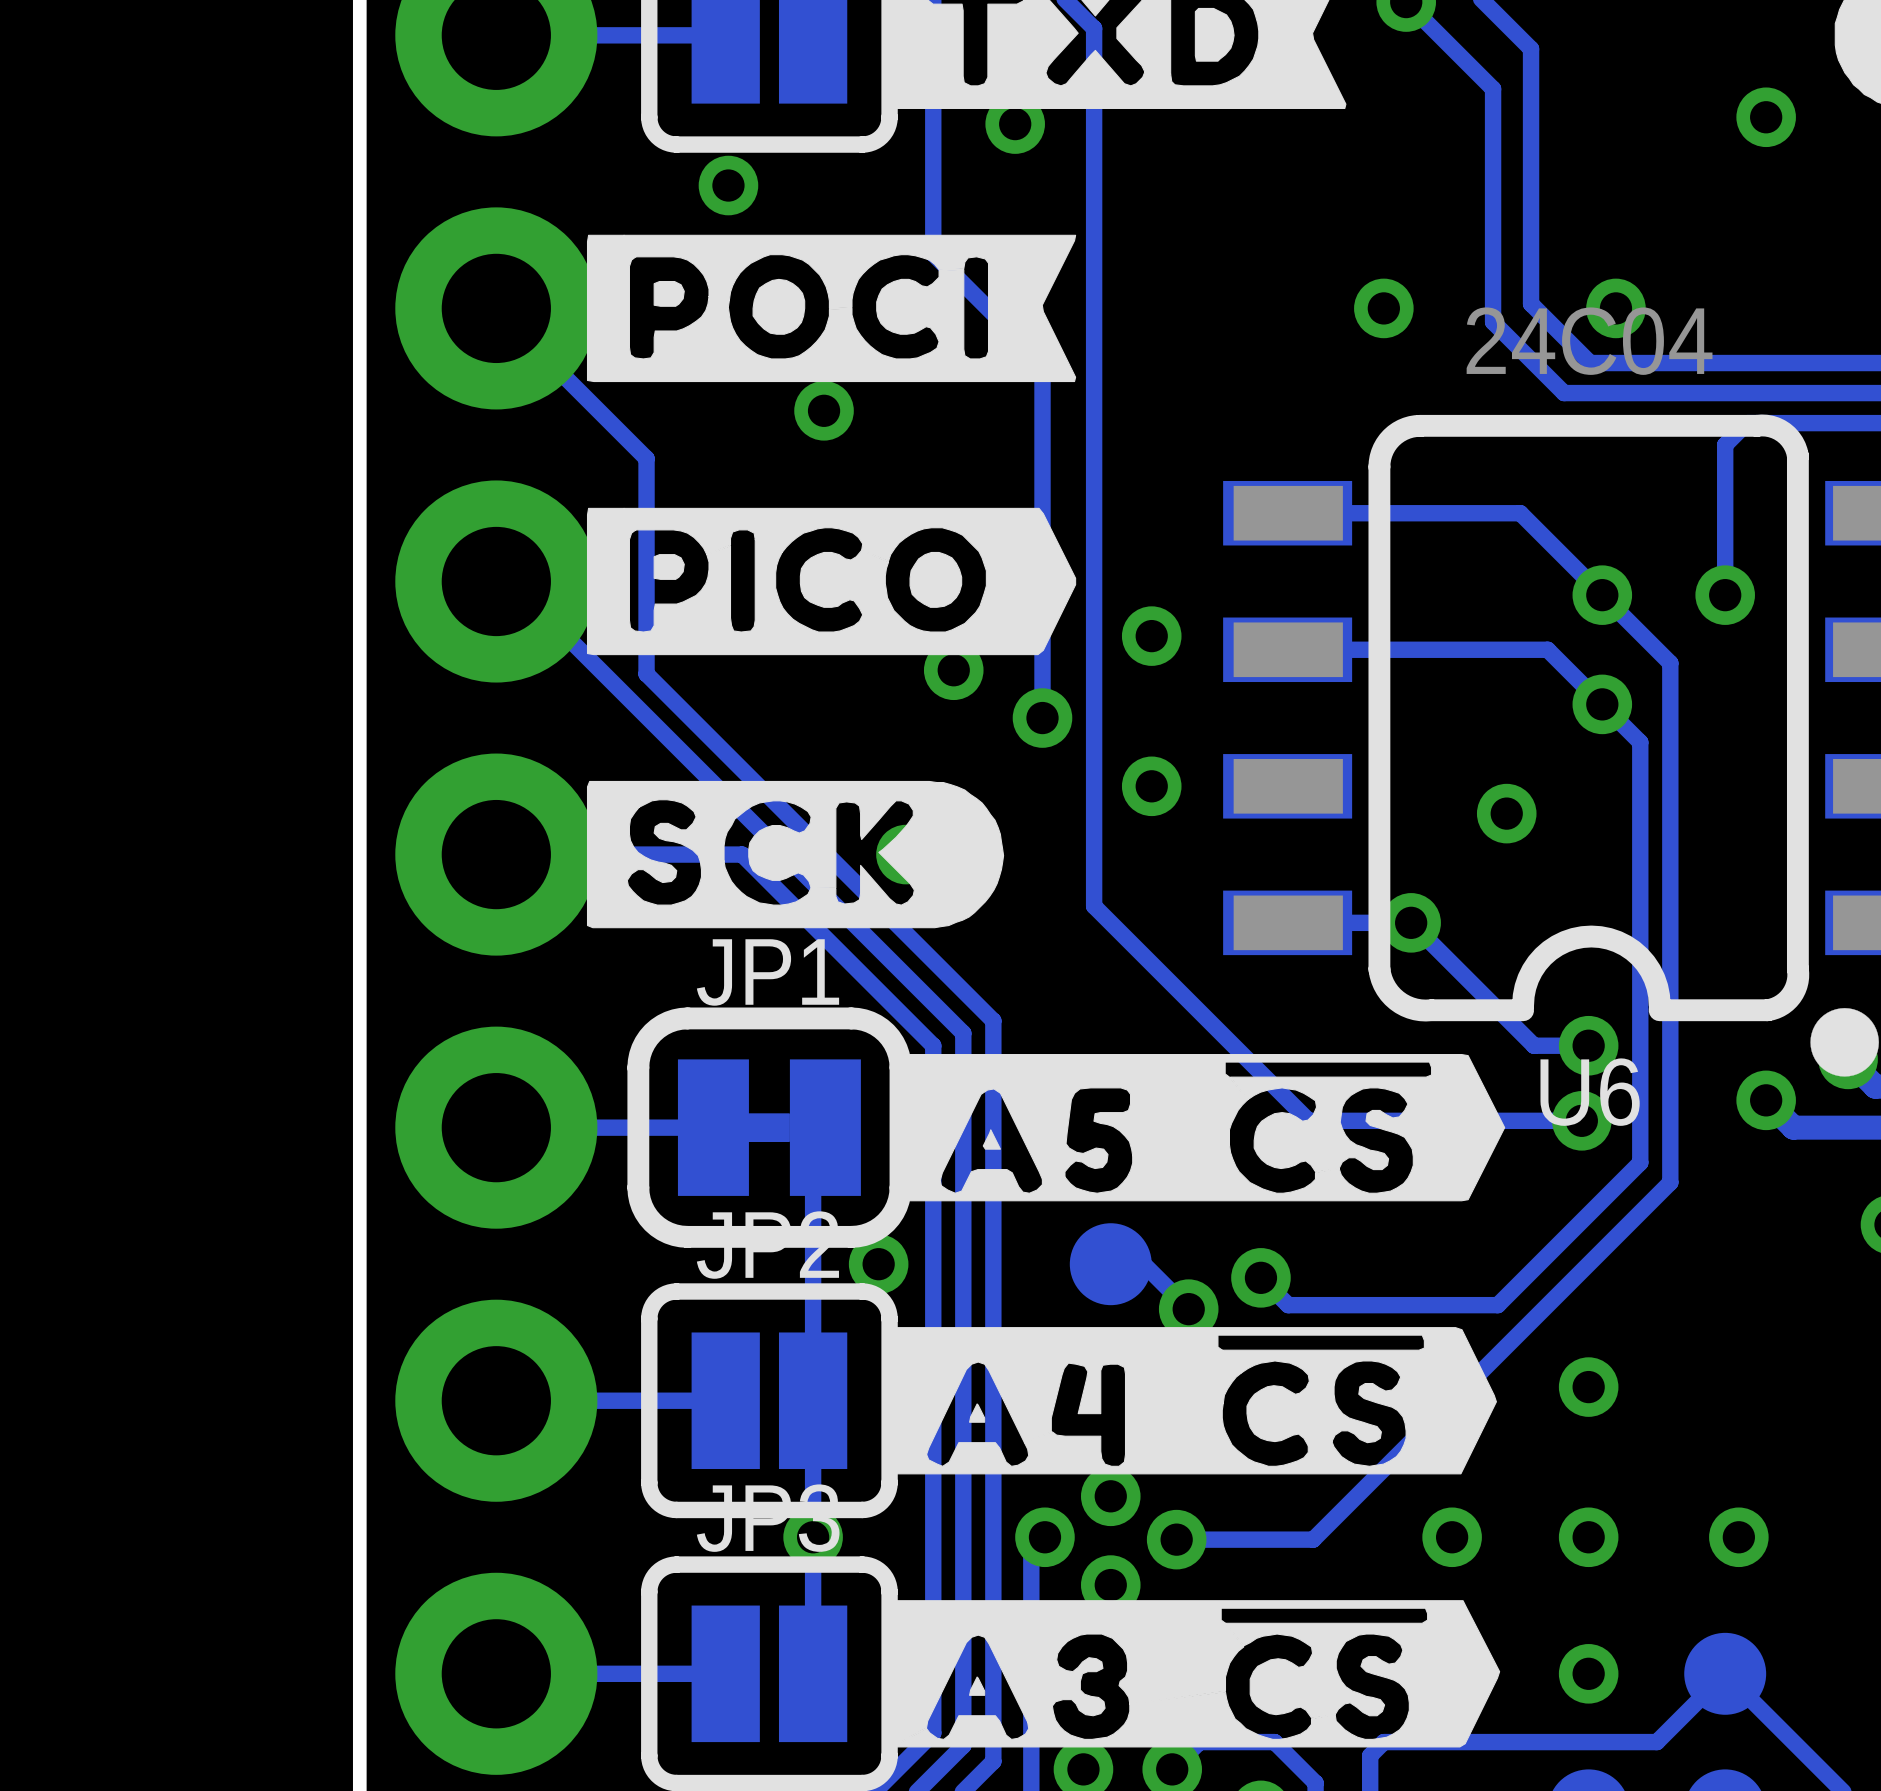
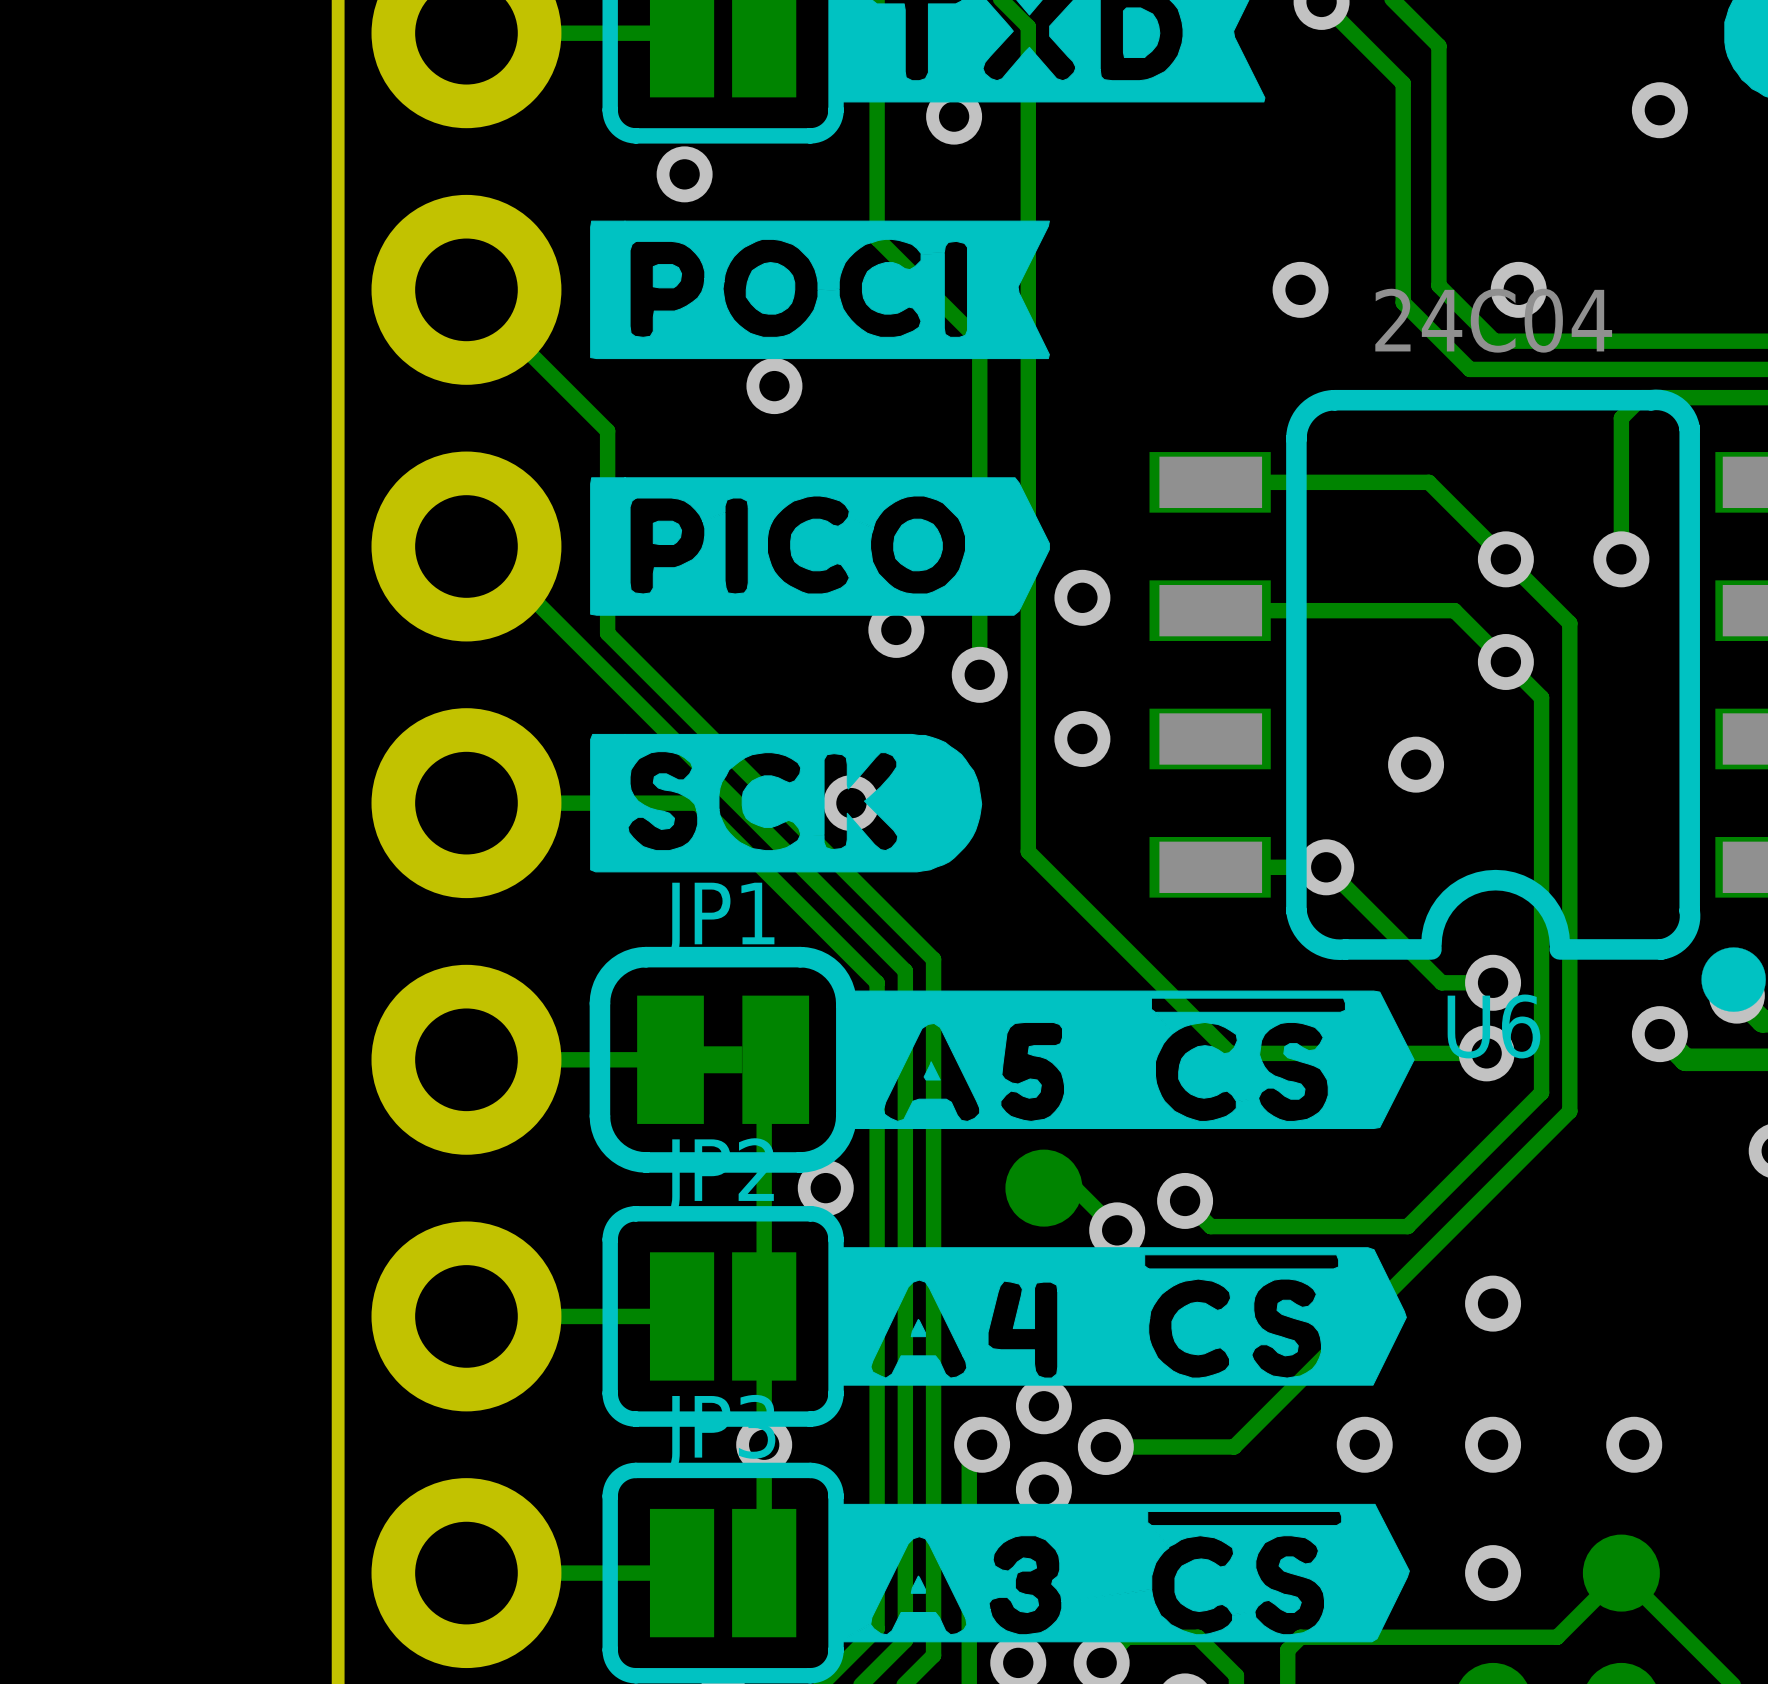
drawing position: (831, 308) -> (820, 289)
drawing position: (831, 581) -> (820, 546)
drawing position: (795, 854) -> (786, 803)

